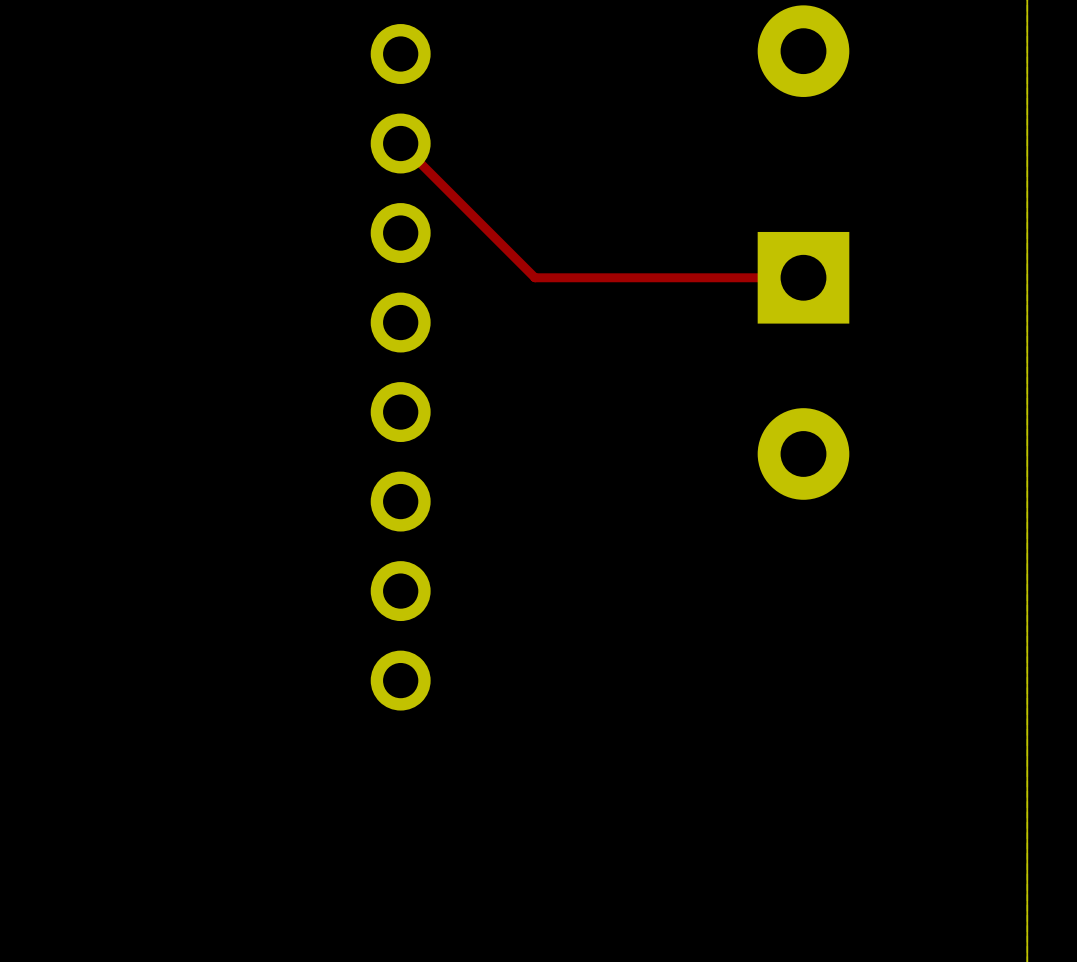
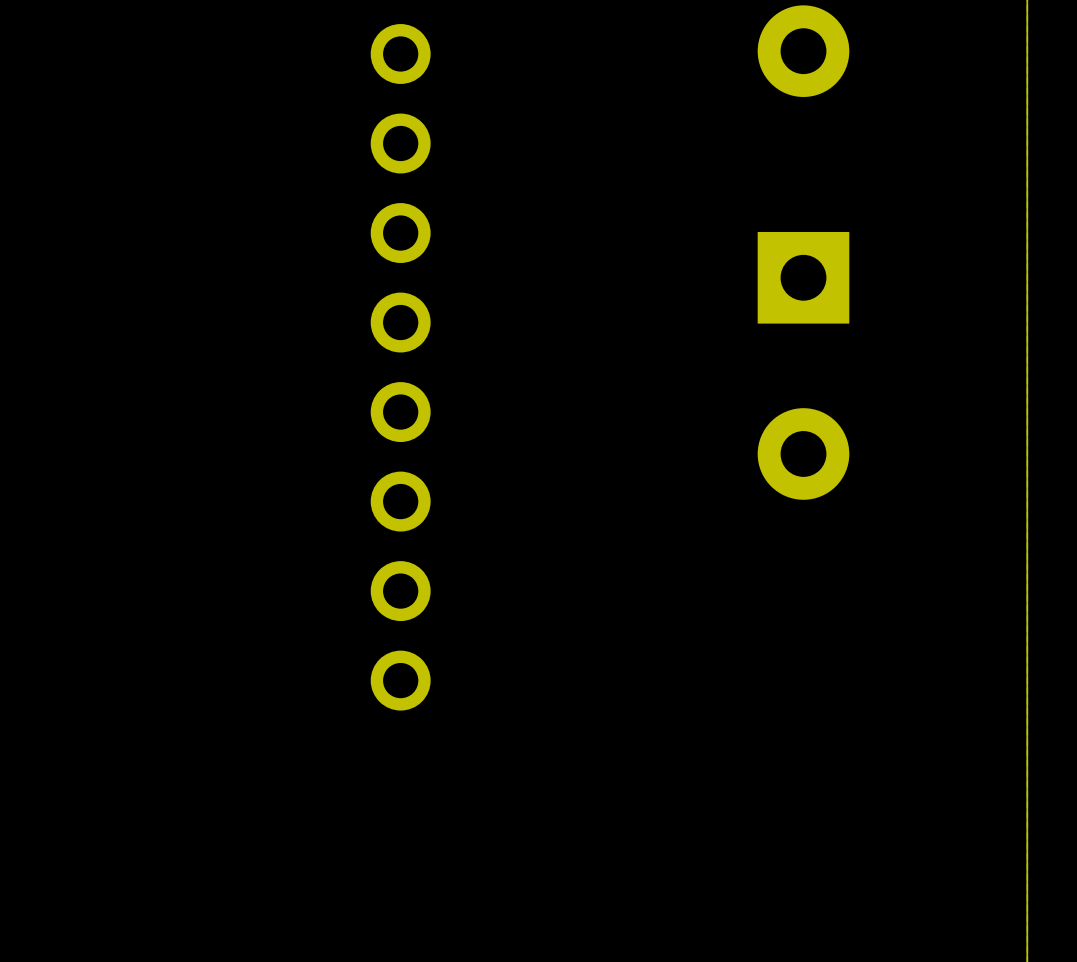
top track: (400, 143) (534, 277) (803, 277) -> none

